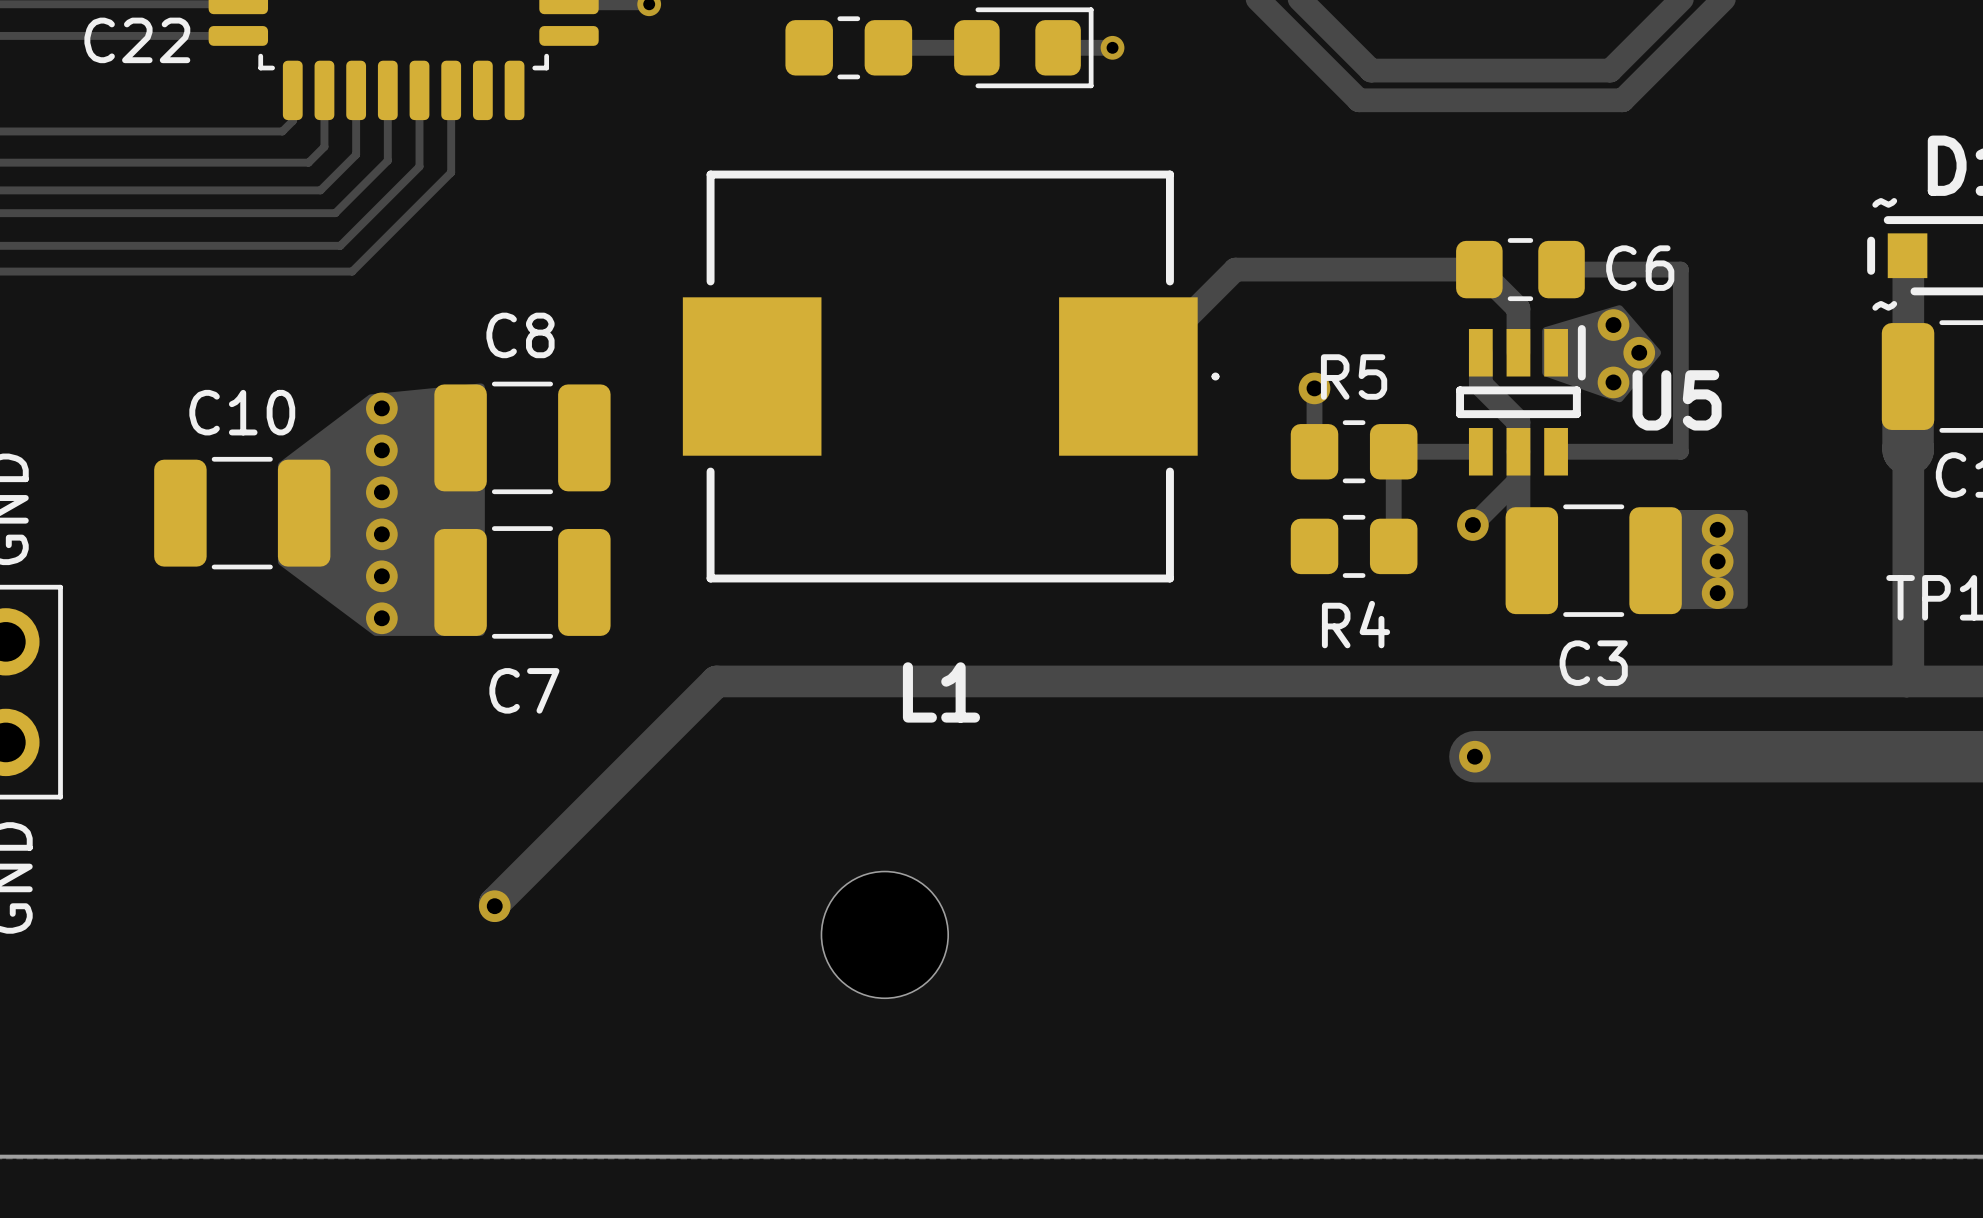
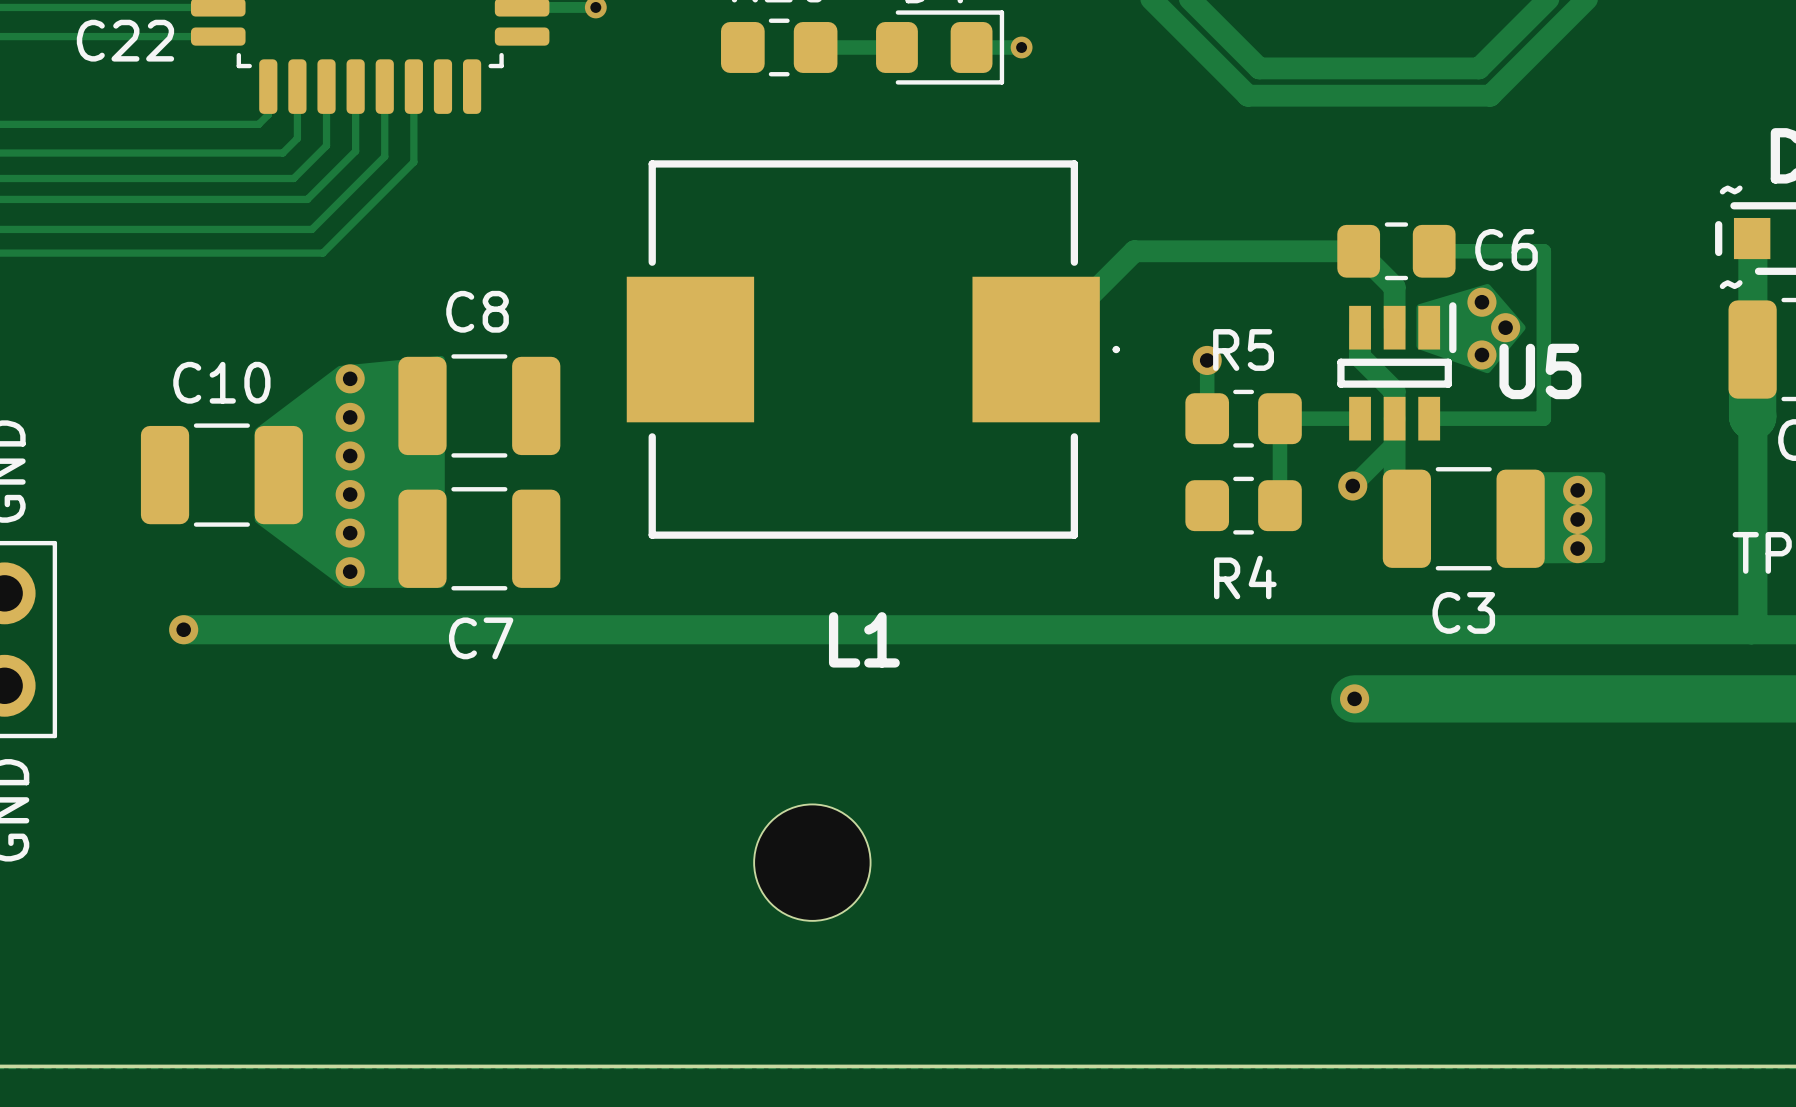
via: none -> (183, 629)
track: (716, 681) (494, 903) (494, 906) -> (657, 629) (183, 629)
via: (494, 906) -> none

